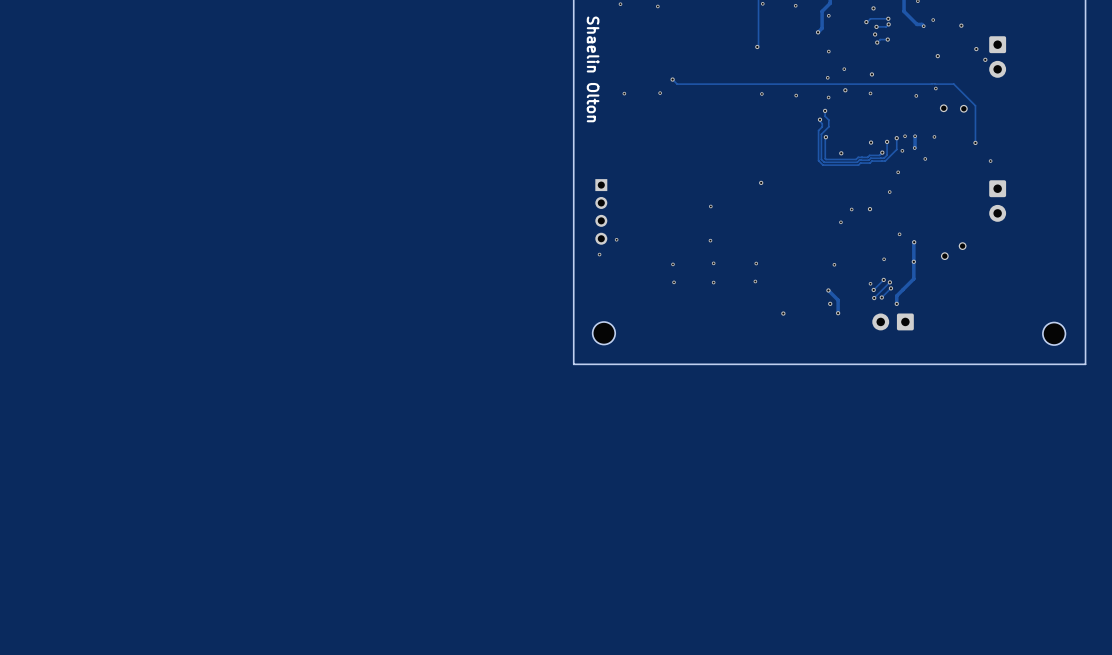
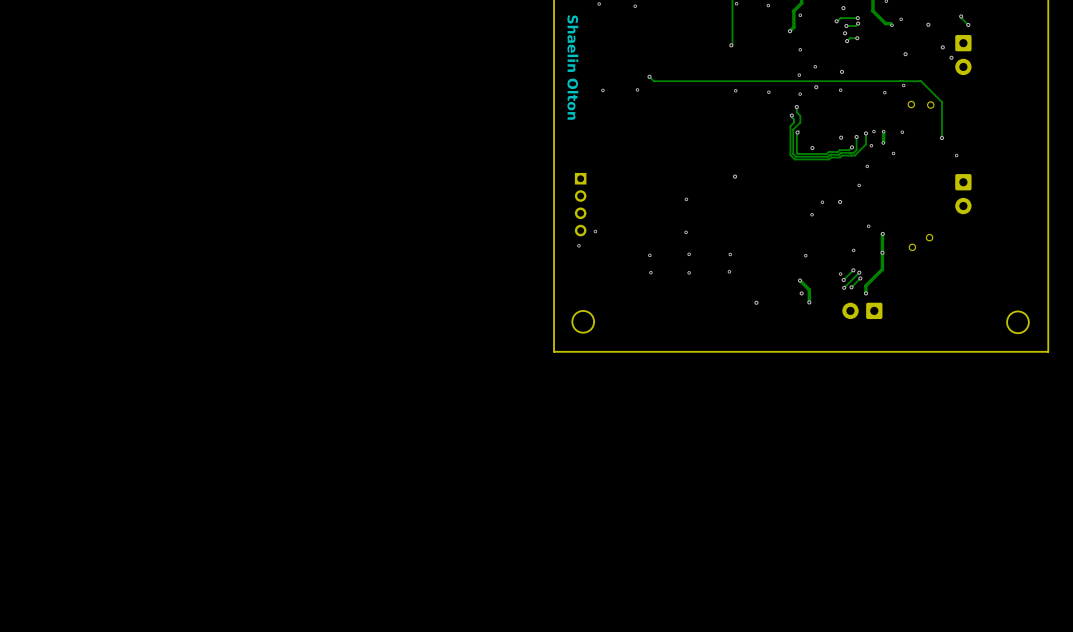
track: none -> (961, 16) (968, 24)
via: none -> (961, 16)
via: none -> (968, 24)

